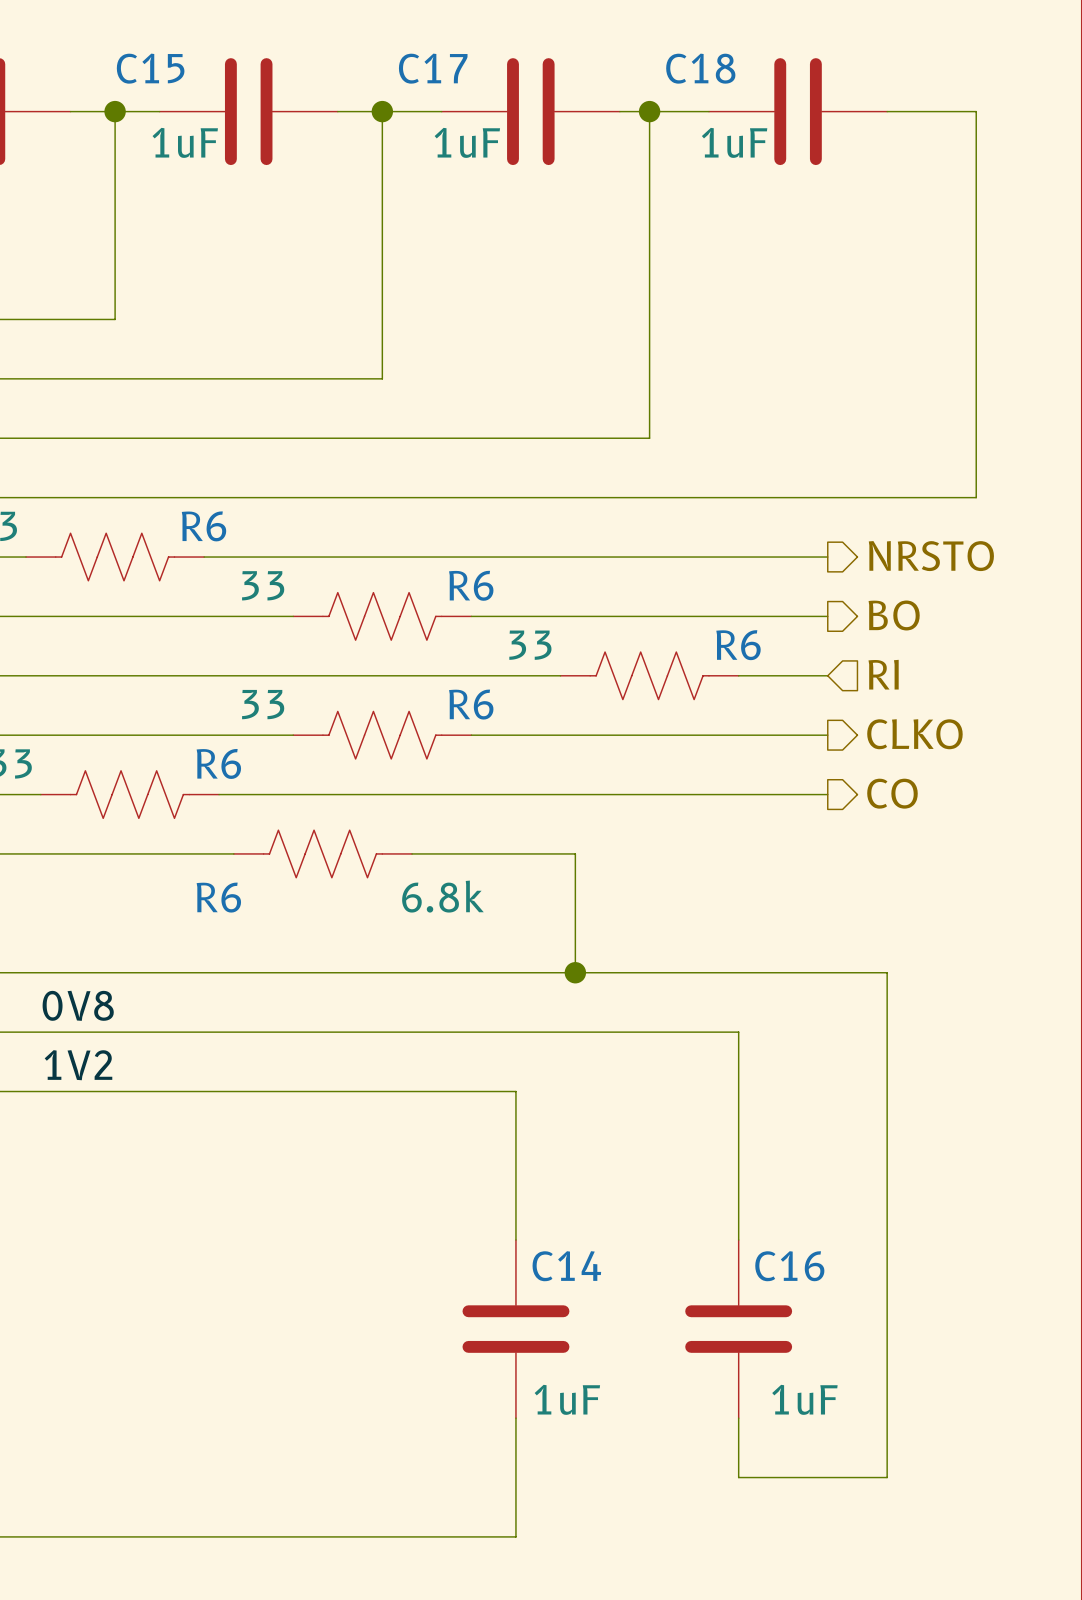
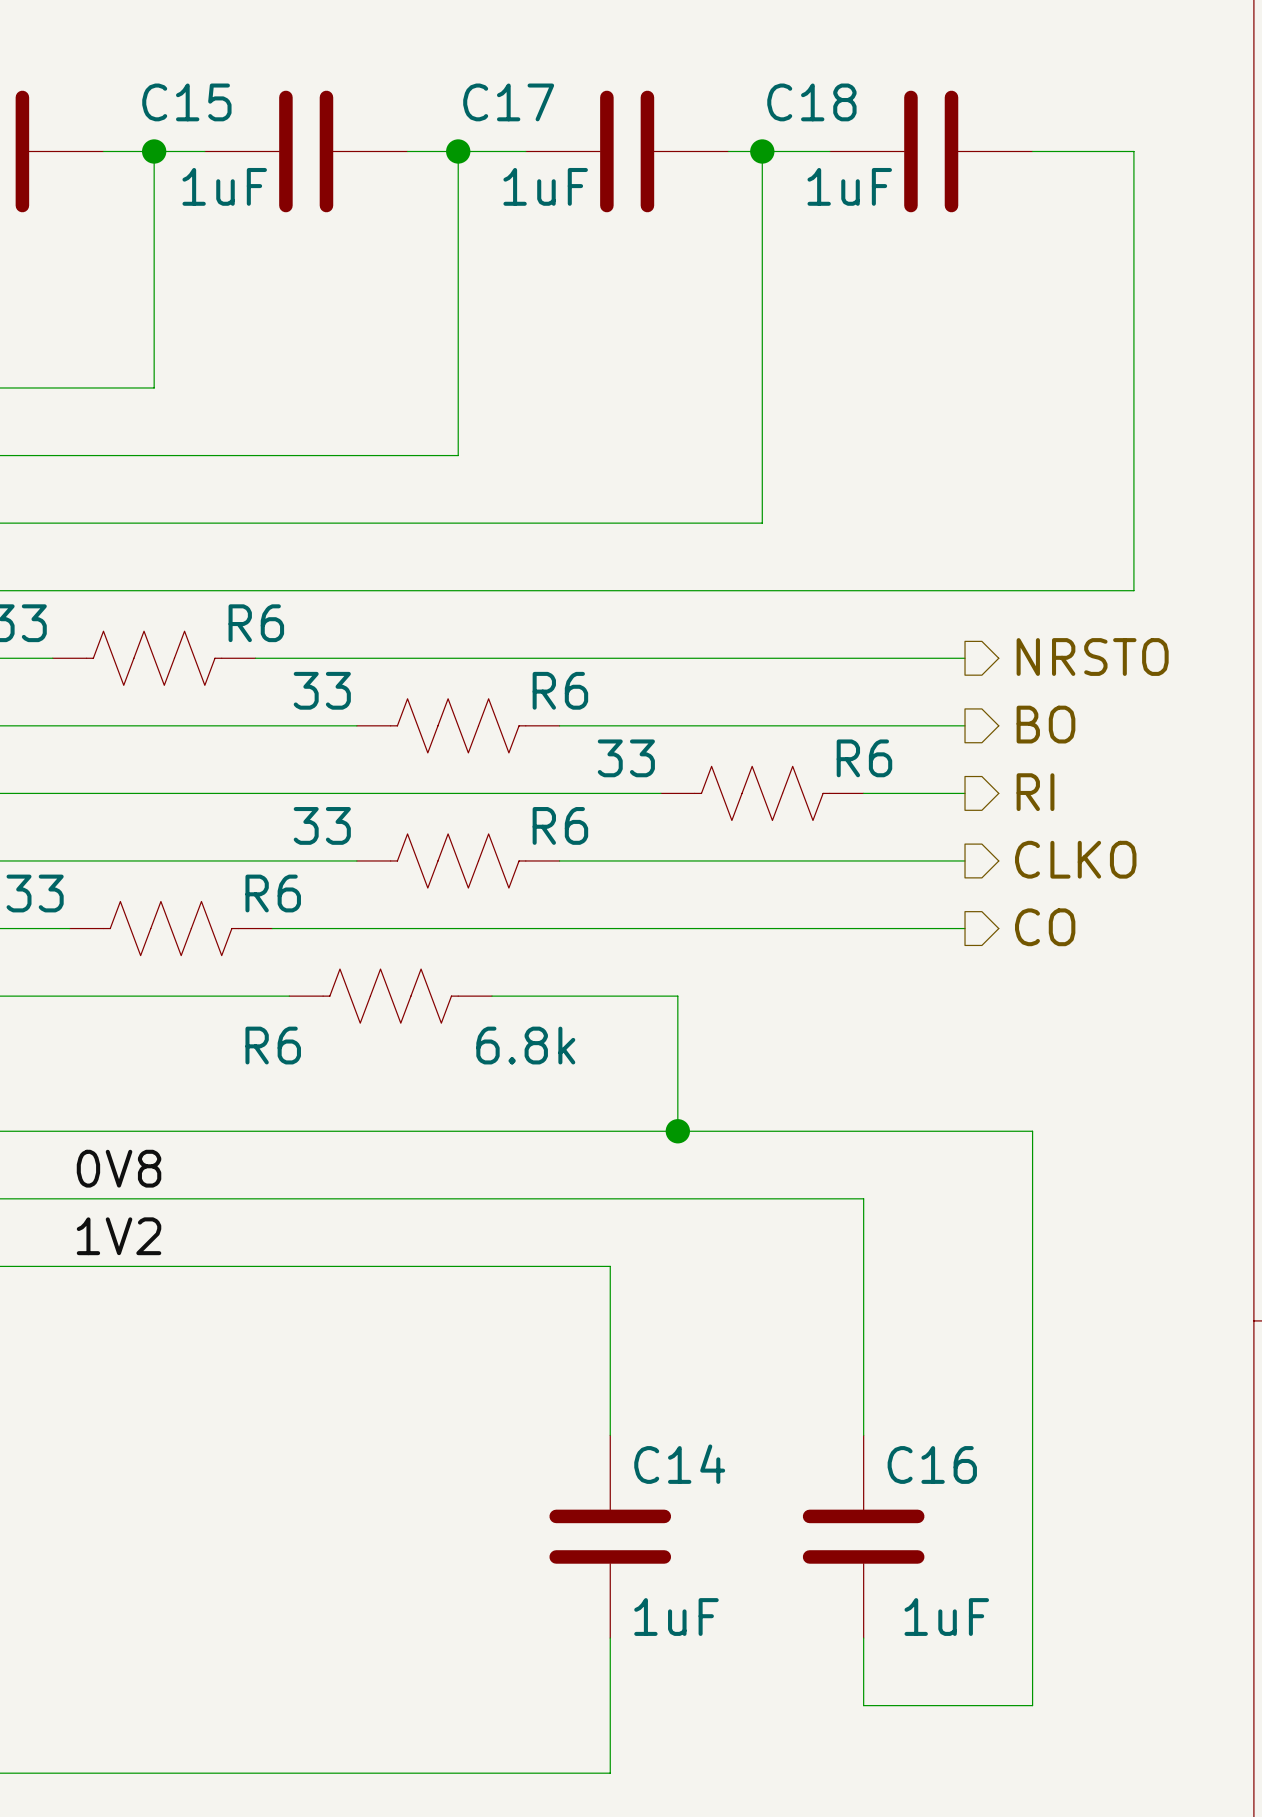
hierarchical label shape: input (883, 674) -> output (1035, 792)

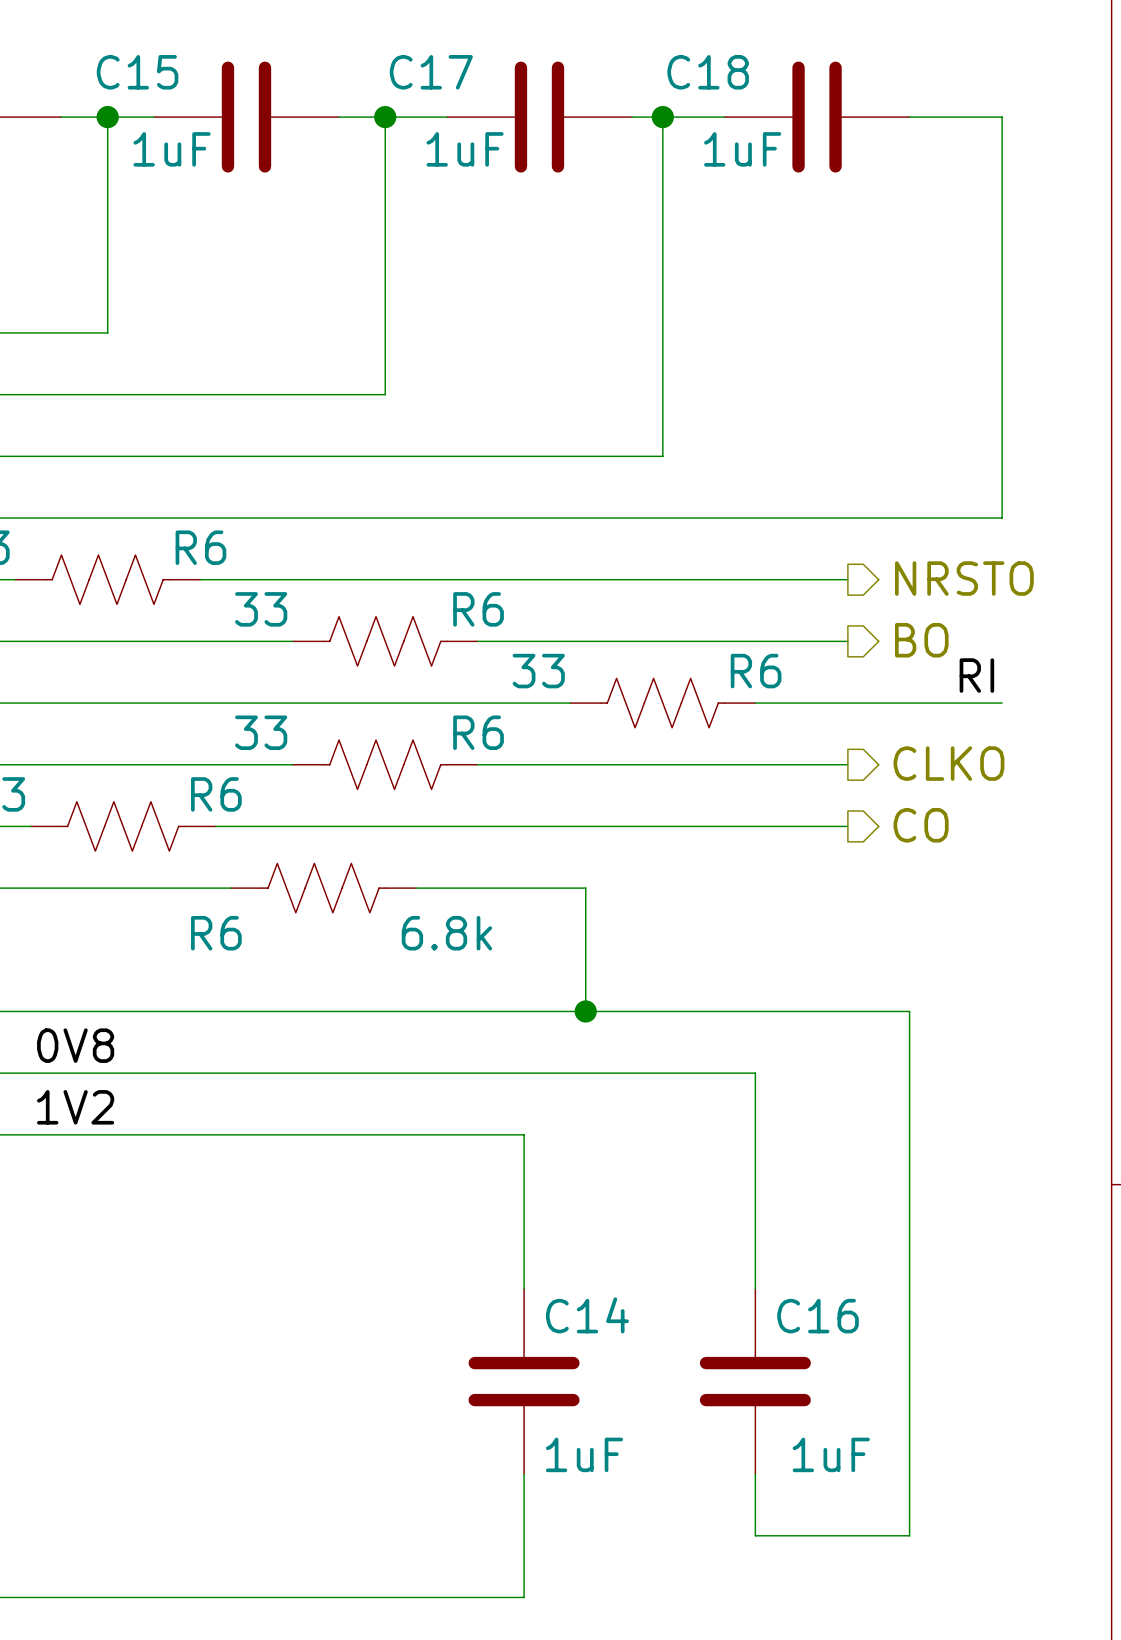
label: none -> RI (976, 675)
hierarchical label: RI (1035, 792) -> none
wire: none -> (847, 703) (1002, 703)

